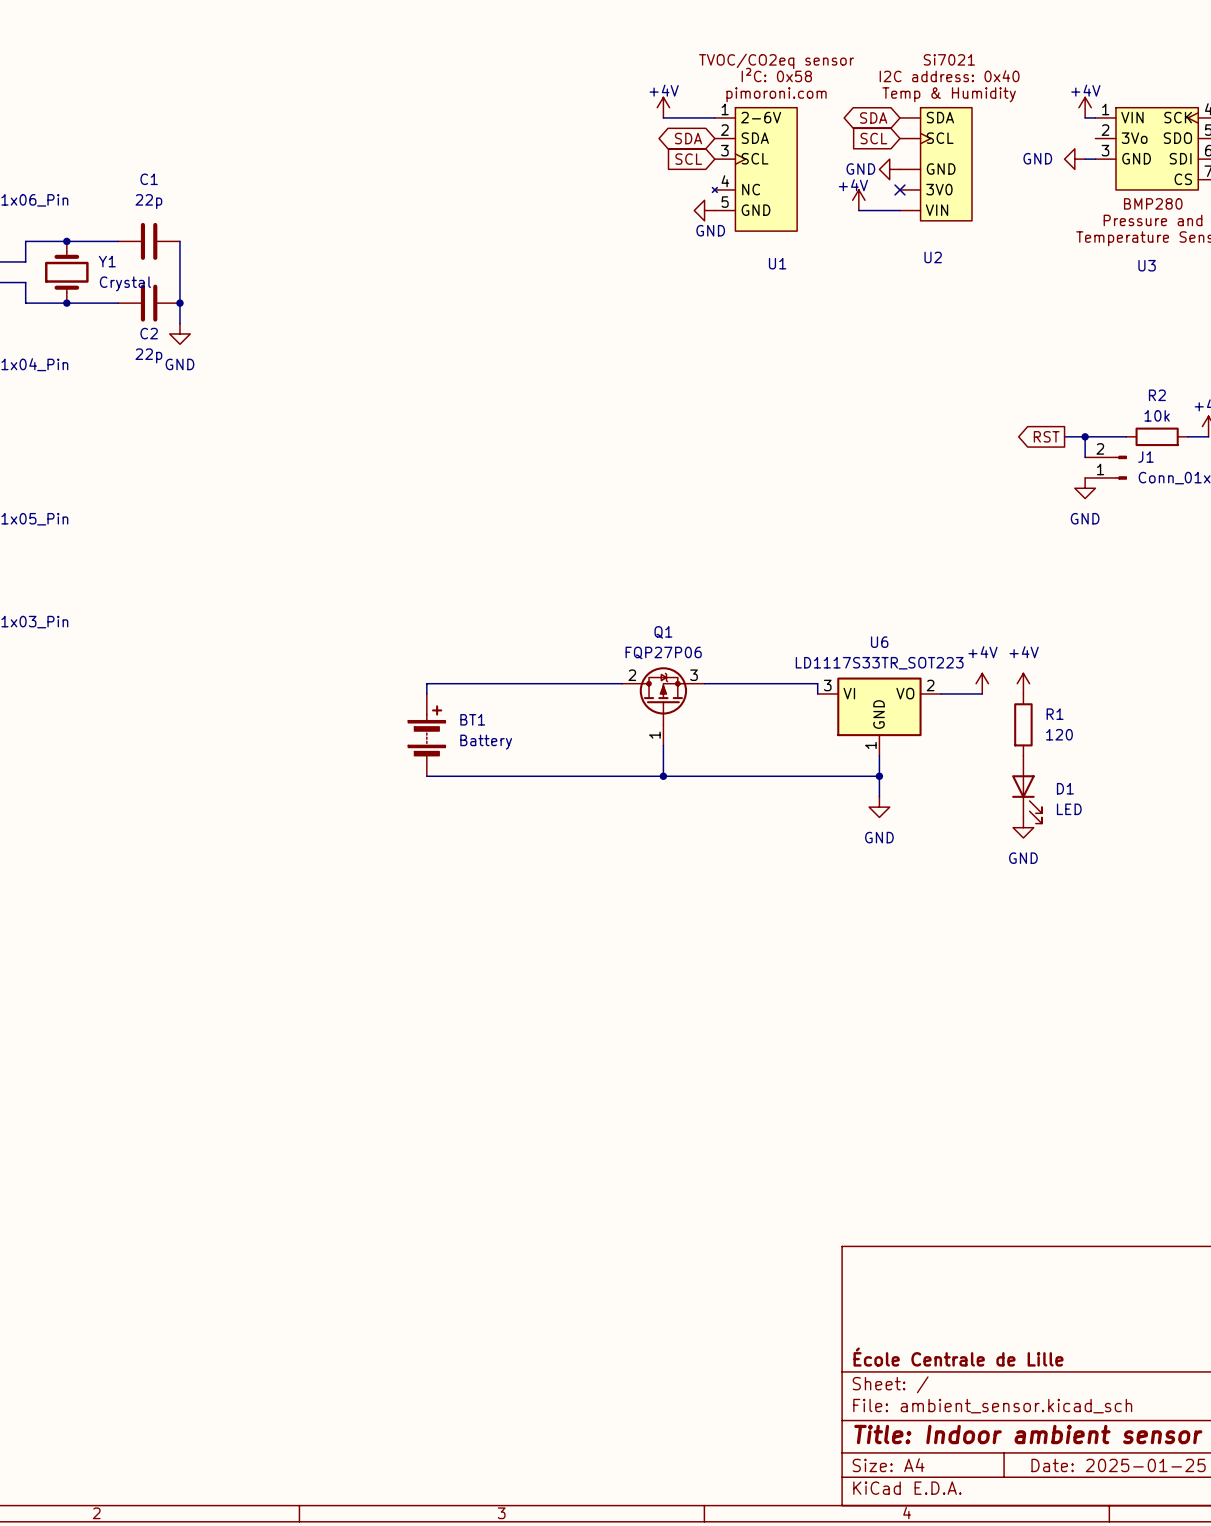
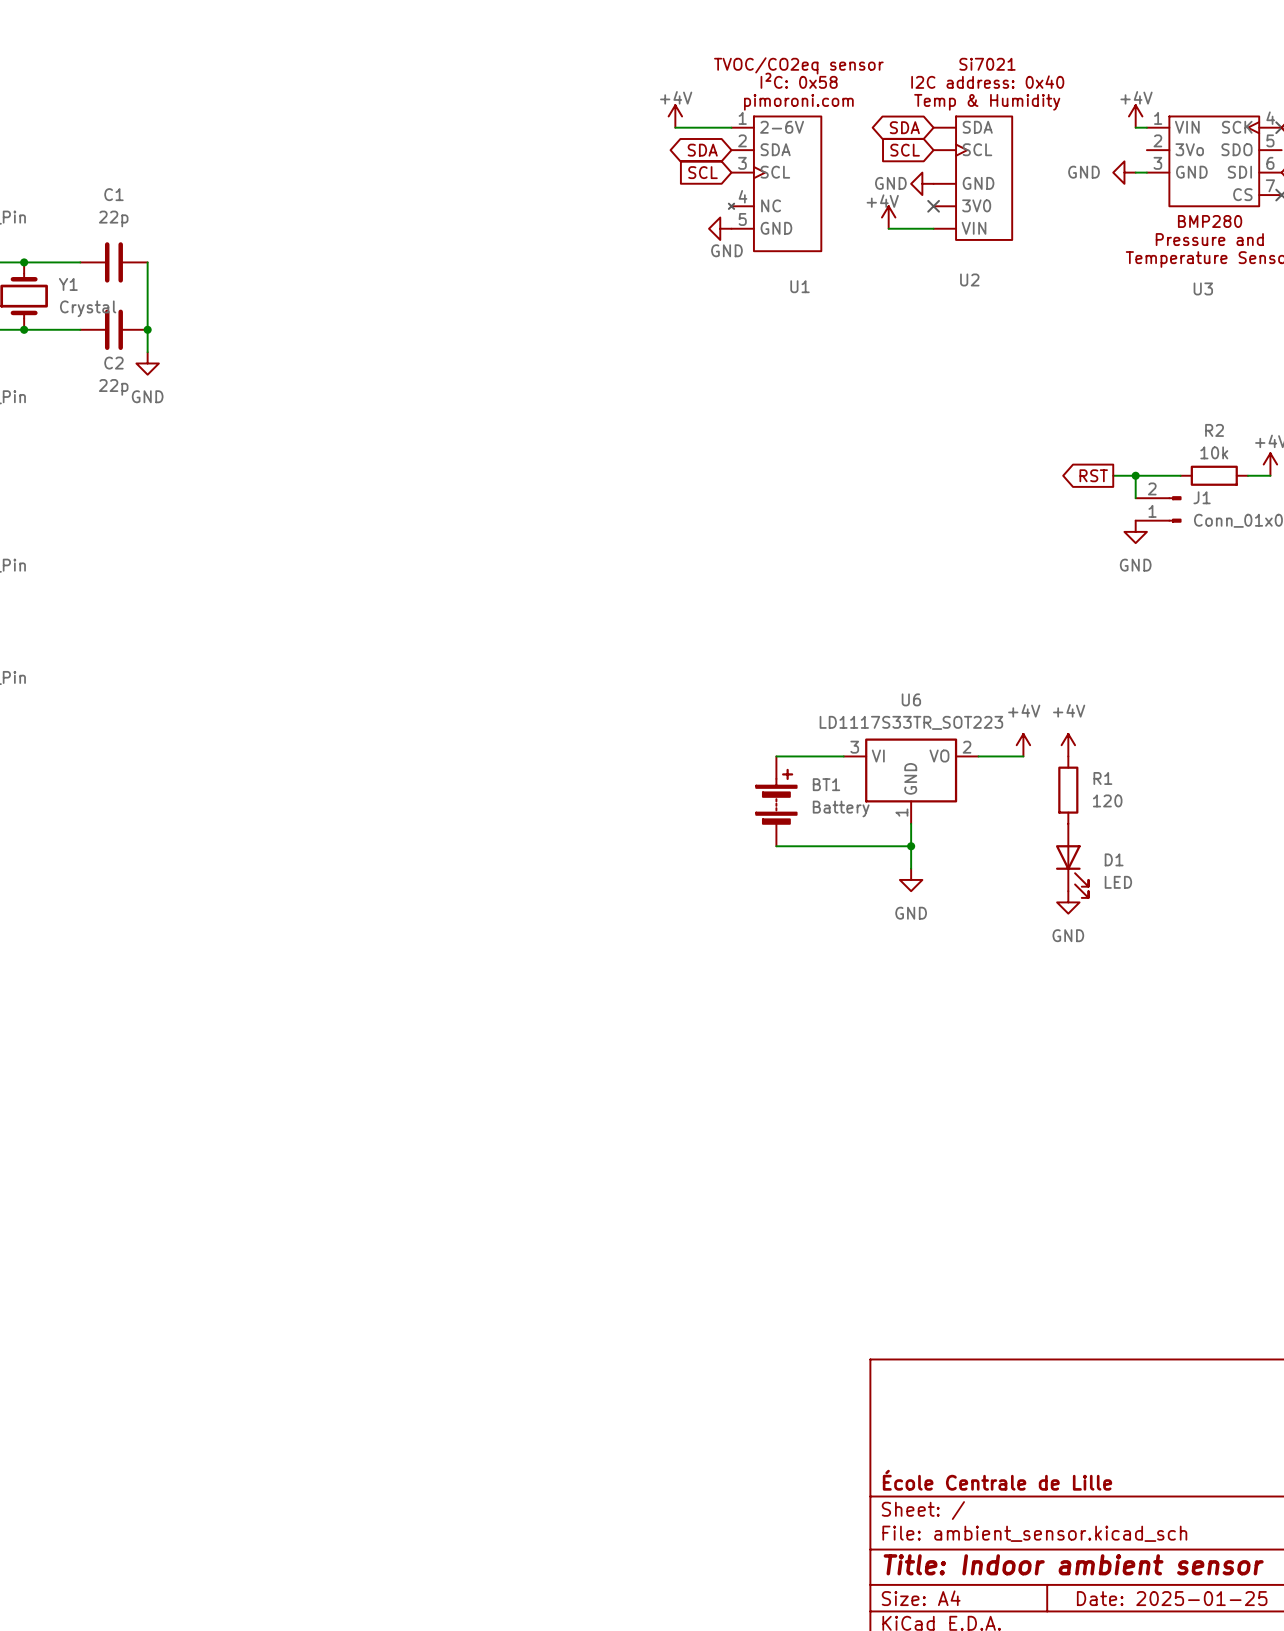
wire: (622, 683) (426, 683) (426, 693) -> none
wire: (704, 683) (817, 683) (817, 693) -> (776, 756) (843, 756)
Q1: FQP27P06 (663, 706) -> none
BT1 position: (426, 735) -> (776, 801)
wire: (663, 745) (663, 776) -> none
wire: (426, 776) (755, 776) -> none
junction: (663, 776) -> none

